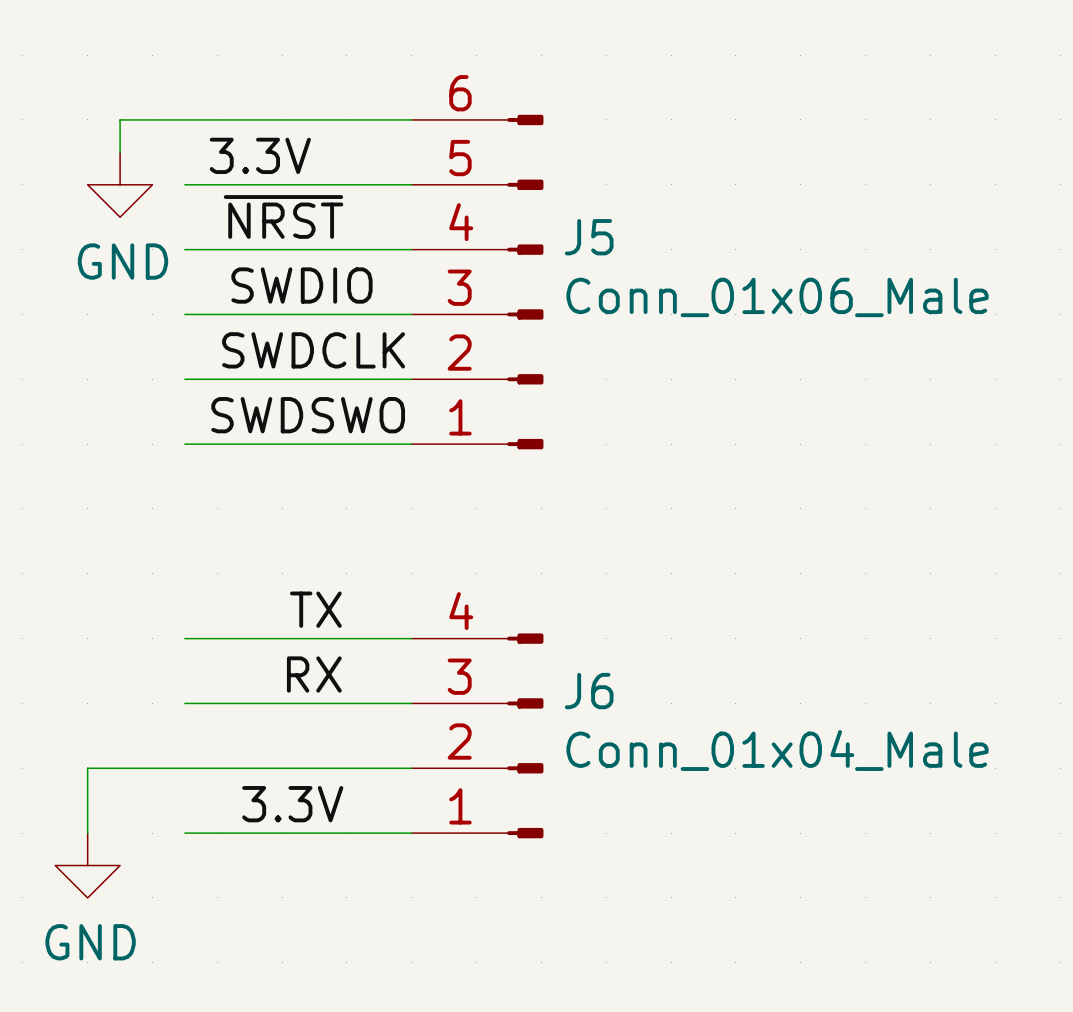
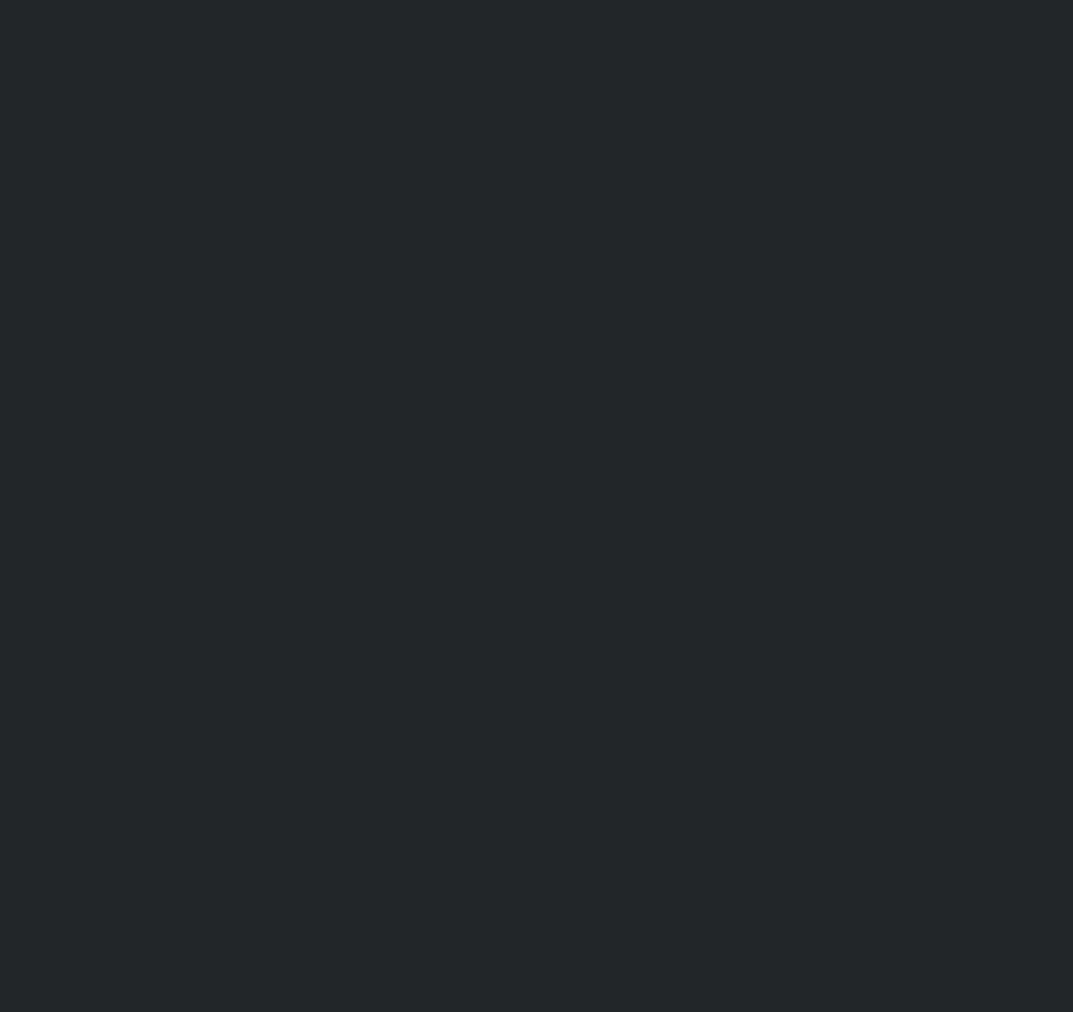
wire: (411, 119) (120, 119) (120, 152) -> none
label: 3.3V (260, 155) -> none
power symbol: GND (120, 184) -> none
wire: (184, 184) (411, 184) -> none
label: ~{NRST} (283, 216) -> none
wire: (184, 249) (411, 249) -> none
J5: Conn_01x06_Male (477, 282) -> none
label: SWDIO (301, 285) -> none
wire: (184, 314) (411, 314) -> none
label: SWDCLK (313, 350) -> none
wire: (184, 379) (411, 379) -> none
label: SWDSWO (308, 415) -> none
wire: (184, 444) (411, 444) -> none
label: TX (315, 609) -> none
wire: (184, 638) (411, 638) -> none
label: RX (314, 674) -> none
wire: (184, 703) (411, 703) -> none
J6: Conn_01x04_Male (477, 735) -> none
wire: (411, 768) (87, 768) (87, 833) -> none
label: 3.3V (292, 804) -> none
wire: (184, 833) (411, 833) -> none
power symbol: GND (87, 865) -> none

